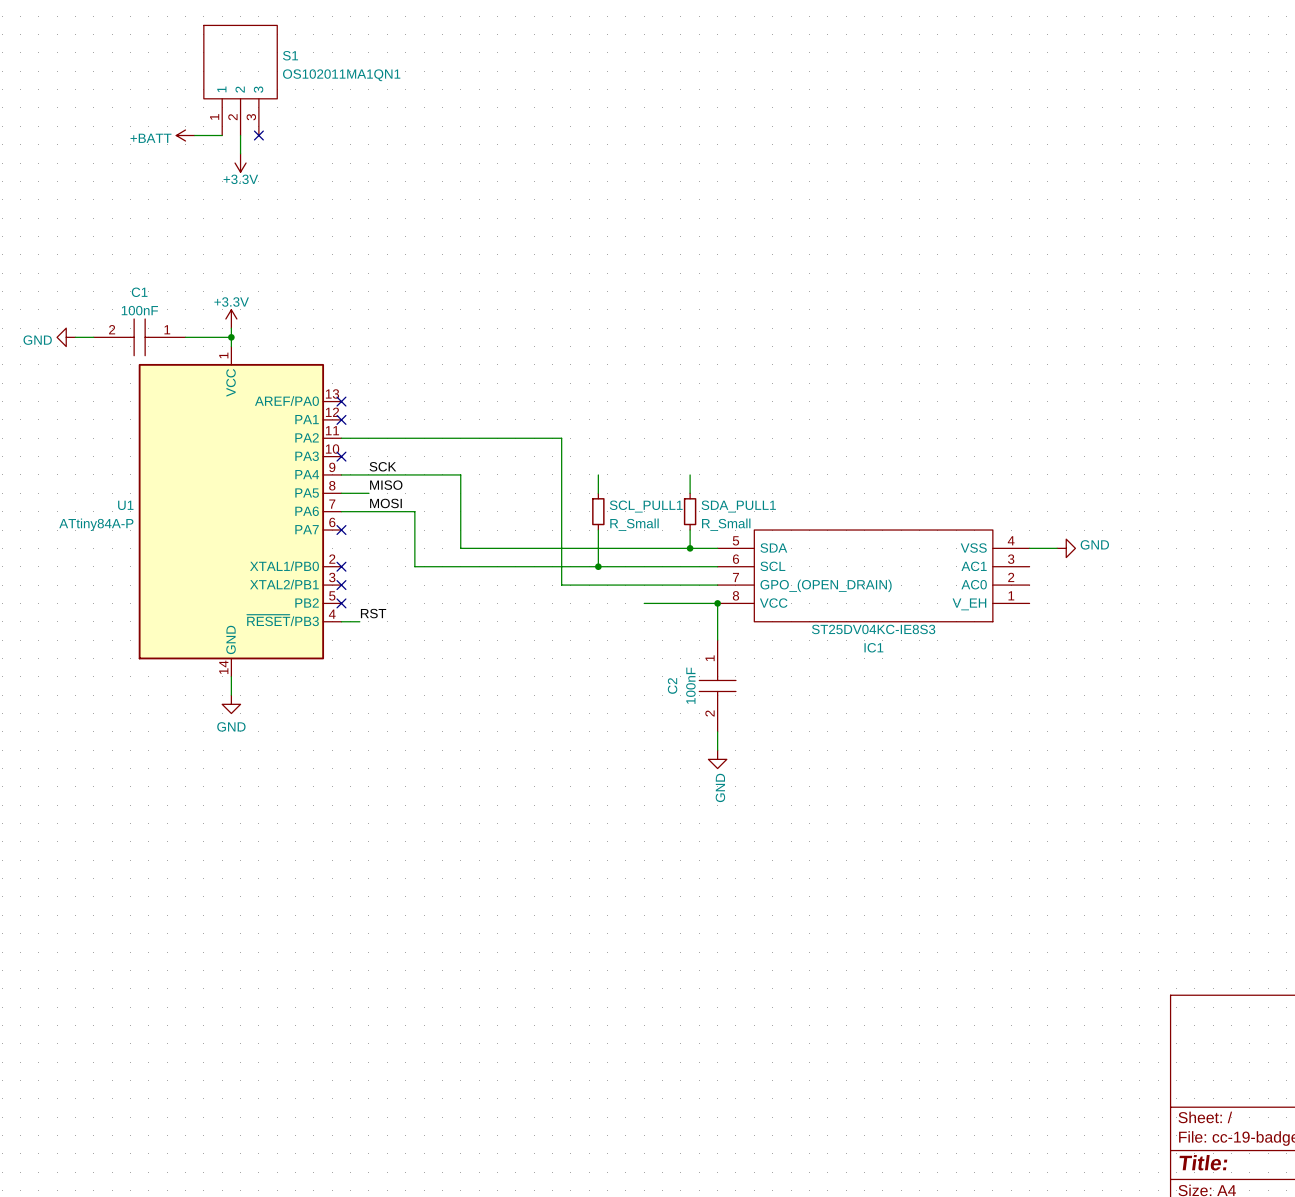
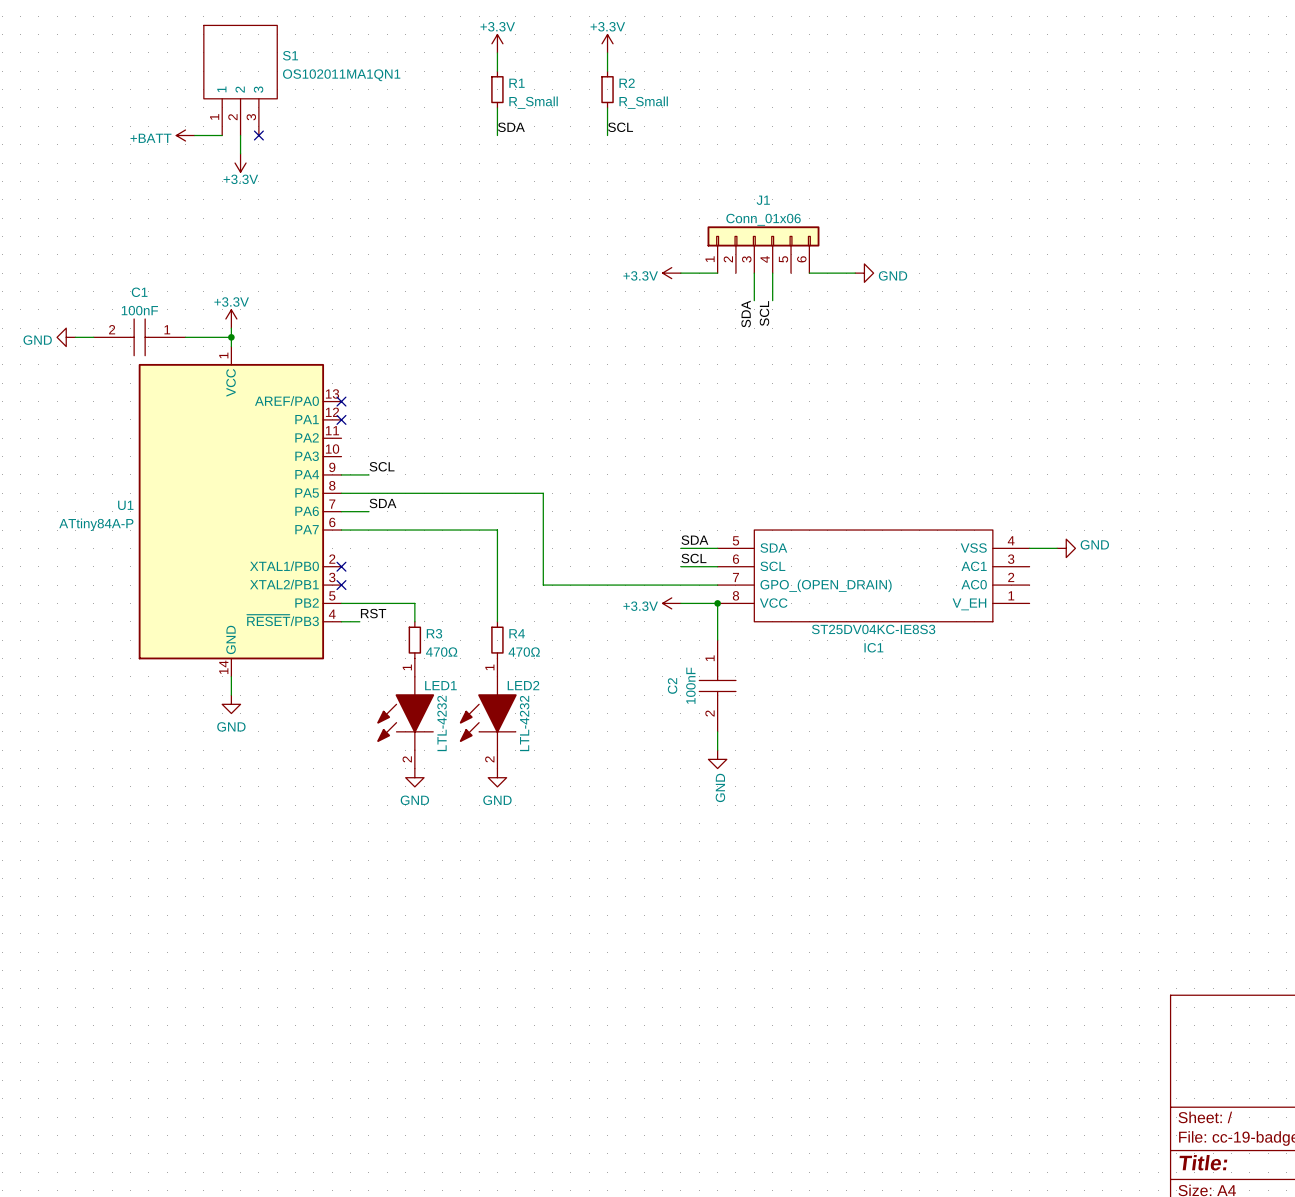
power symbol: none -> +3.3V (497, 43)
power symbol: none -> +3.3V (607, 43)
wire: none -> (497, 52) (497, 71)
wire: none -> (607, 52) (607, 71)
R1: none -> R_Small (497, 89)
R2: none -> R_Small (607, 89)
wire: none -> (497, 107) (497, 135)
wire: none -> (607, 107) (607, 135)
label: none -> SDA (511, 127)
label: none -> SCL (620, 127)
J1: none -> Conn_01x06 (763, 249)
power symbol: none -> +3.3V (671, 273)
wire: none -> (680, 273) (717, 273)
wire: none -> (754, 273) (754, 300)
wire: none -> (772, 273) (772, 300)
wire: none -> (809, 273) (855, 273)
power symbol: none -> GND (864, 273)
label: none -> SCL (764, 313)
label: none -> SDA (746, 314)
wire: (341, 438) (561, 438) (561, 585) -> (368, 493) (543, 493) (543, 585) (561, 585)
no-connect mark: (341, 456) -> none
label: SCK (382, 466) -> SCL (382, 466)
wire: (368, 474) (460, 474) (460, 548) (680, 548) -> none
wire: (598, 474) (598, 493) -> none
wire: (690, 474) (690, 493) -> none
label: MISO (386, 485) -> none
label: MOSI (385, 503) -> SDA (382, 503)
wire: (368, 511) (414, 511) (414, 566) (680, 566) -> none
SCL_PULL1: R_Small (598, 511) -> none
SDA_PULL1: R_Small (690, 511) -> none
wire: none -> (341, 530) (497, 530) (497, 621)
no-connect mark: (341, 530) -> none
wire: (598, 530) (598, 566) -> none
wire: (690, 530) (690, 548) -> none
label: none -> SDA (694, 540)
junction: (690, 548) -> none
label: none -> SCL (693, 558)
junction: (598, 566) -> none
wire: none -> (341, 603) (414, 603) (414, 621)
no-connect mark: (341, 603) -> none
power symbol: none -> +3.3V (671, 603)
R3: none -> 470Ω (414, 640)
R4: none -> 470Ω (497, 640)
LED1: none -> LTL-4232 (405, 713)
LED2: none -> LTL-4232 (488, 713)
power symbol: none -> GND (414, 777)
power symbol: none -> GND (497, 777)

